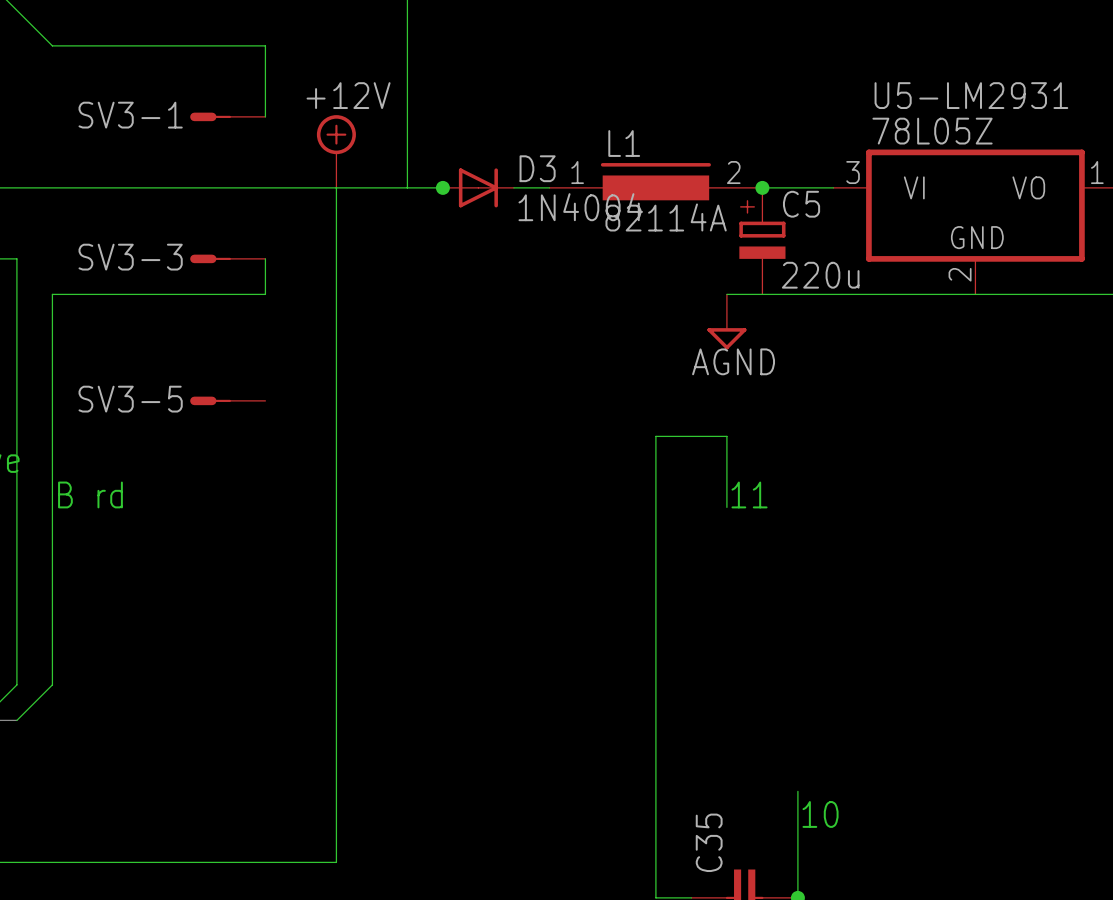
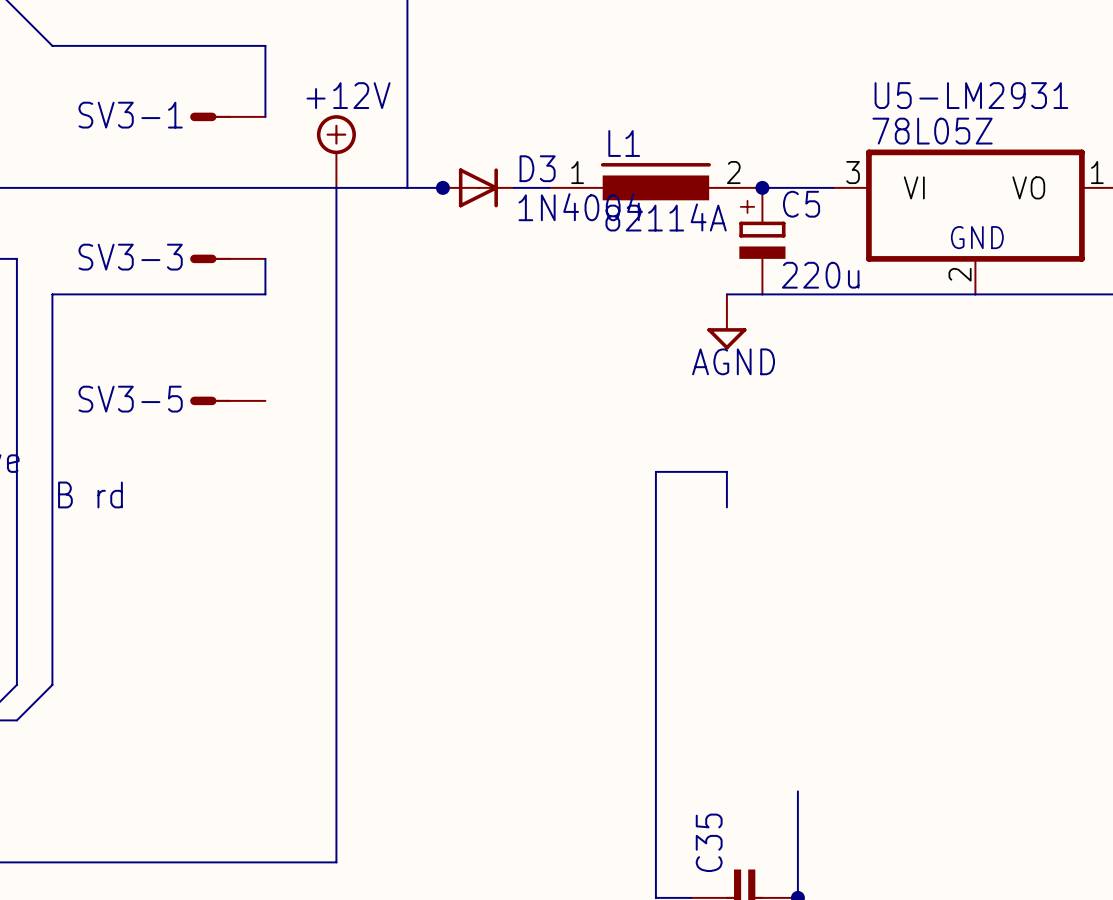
wire: (655, 471) (655, 436) (726, 436) (726, 471) -> (655, 471) (726, 471)
text: 11 (749, 494) -> none
text: 10 (820, 814) -> none

